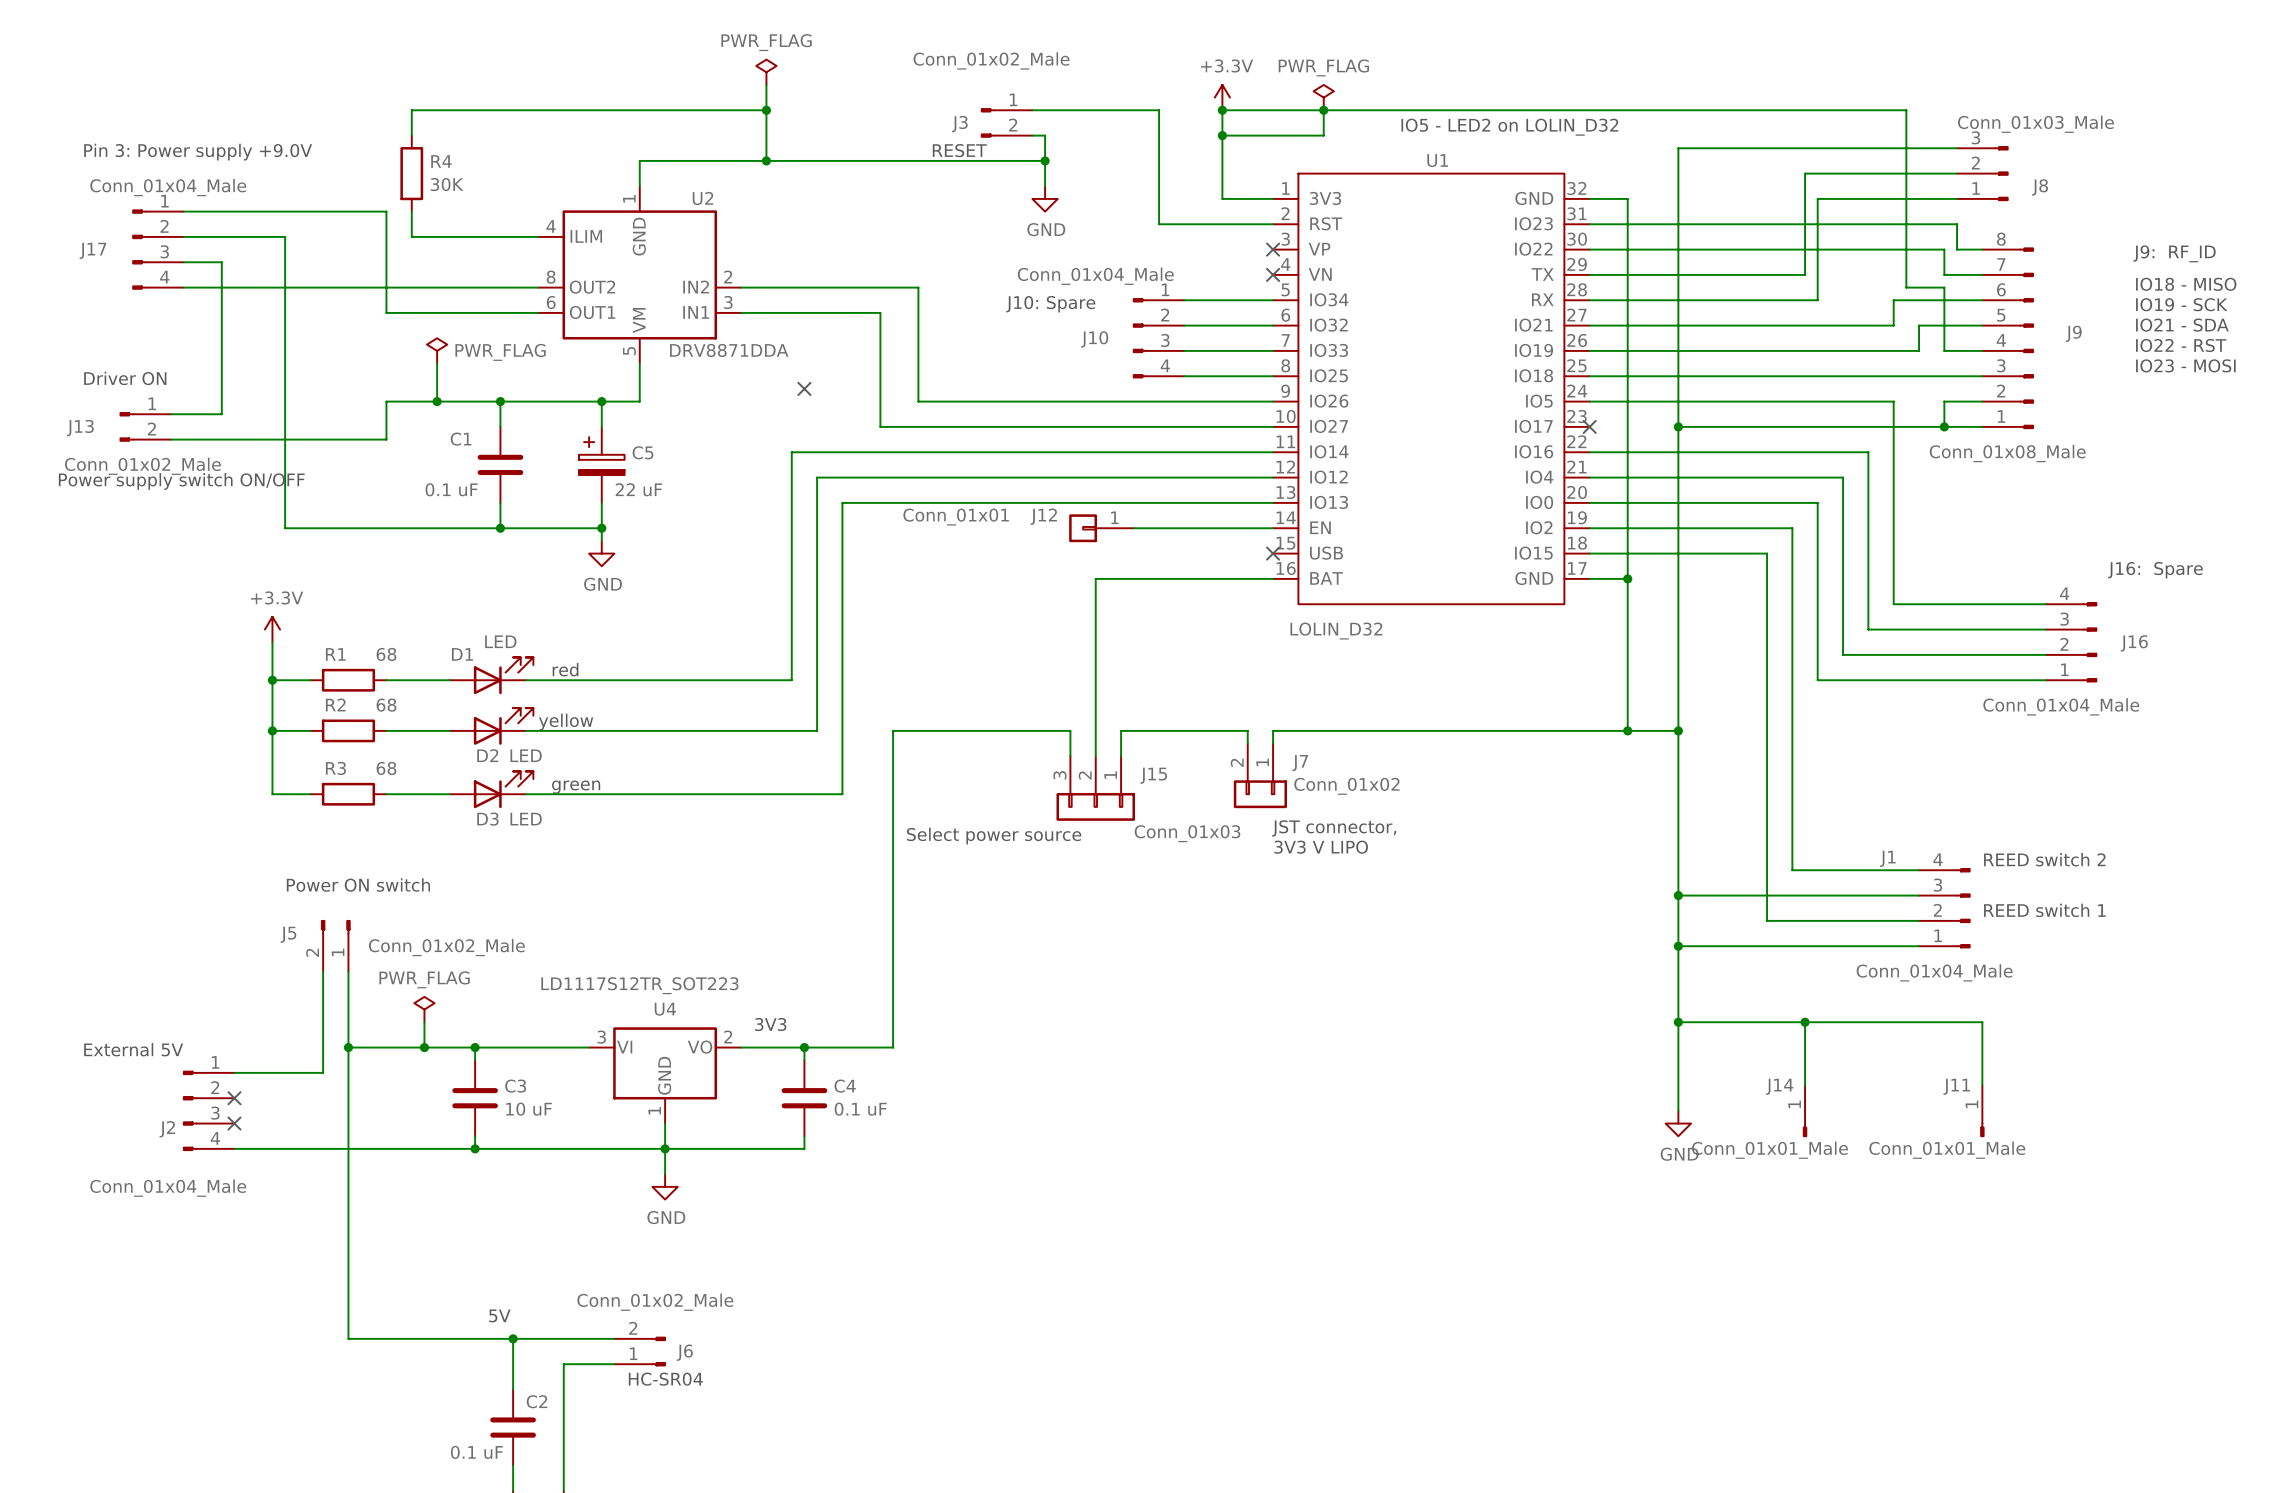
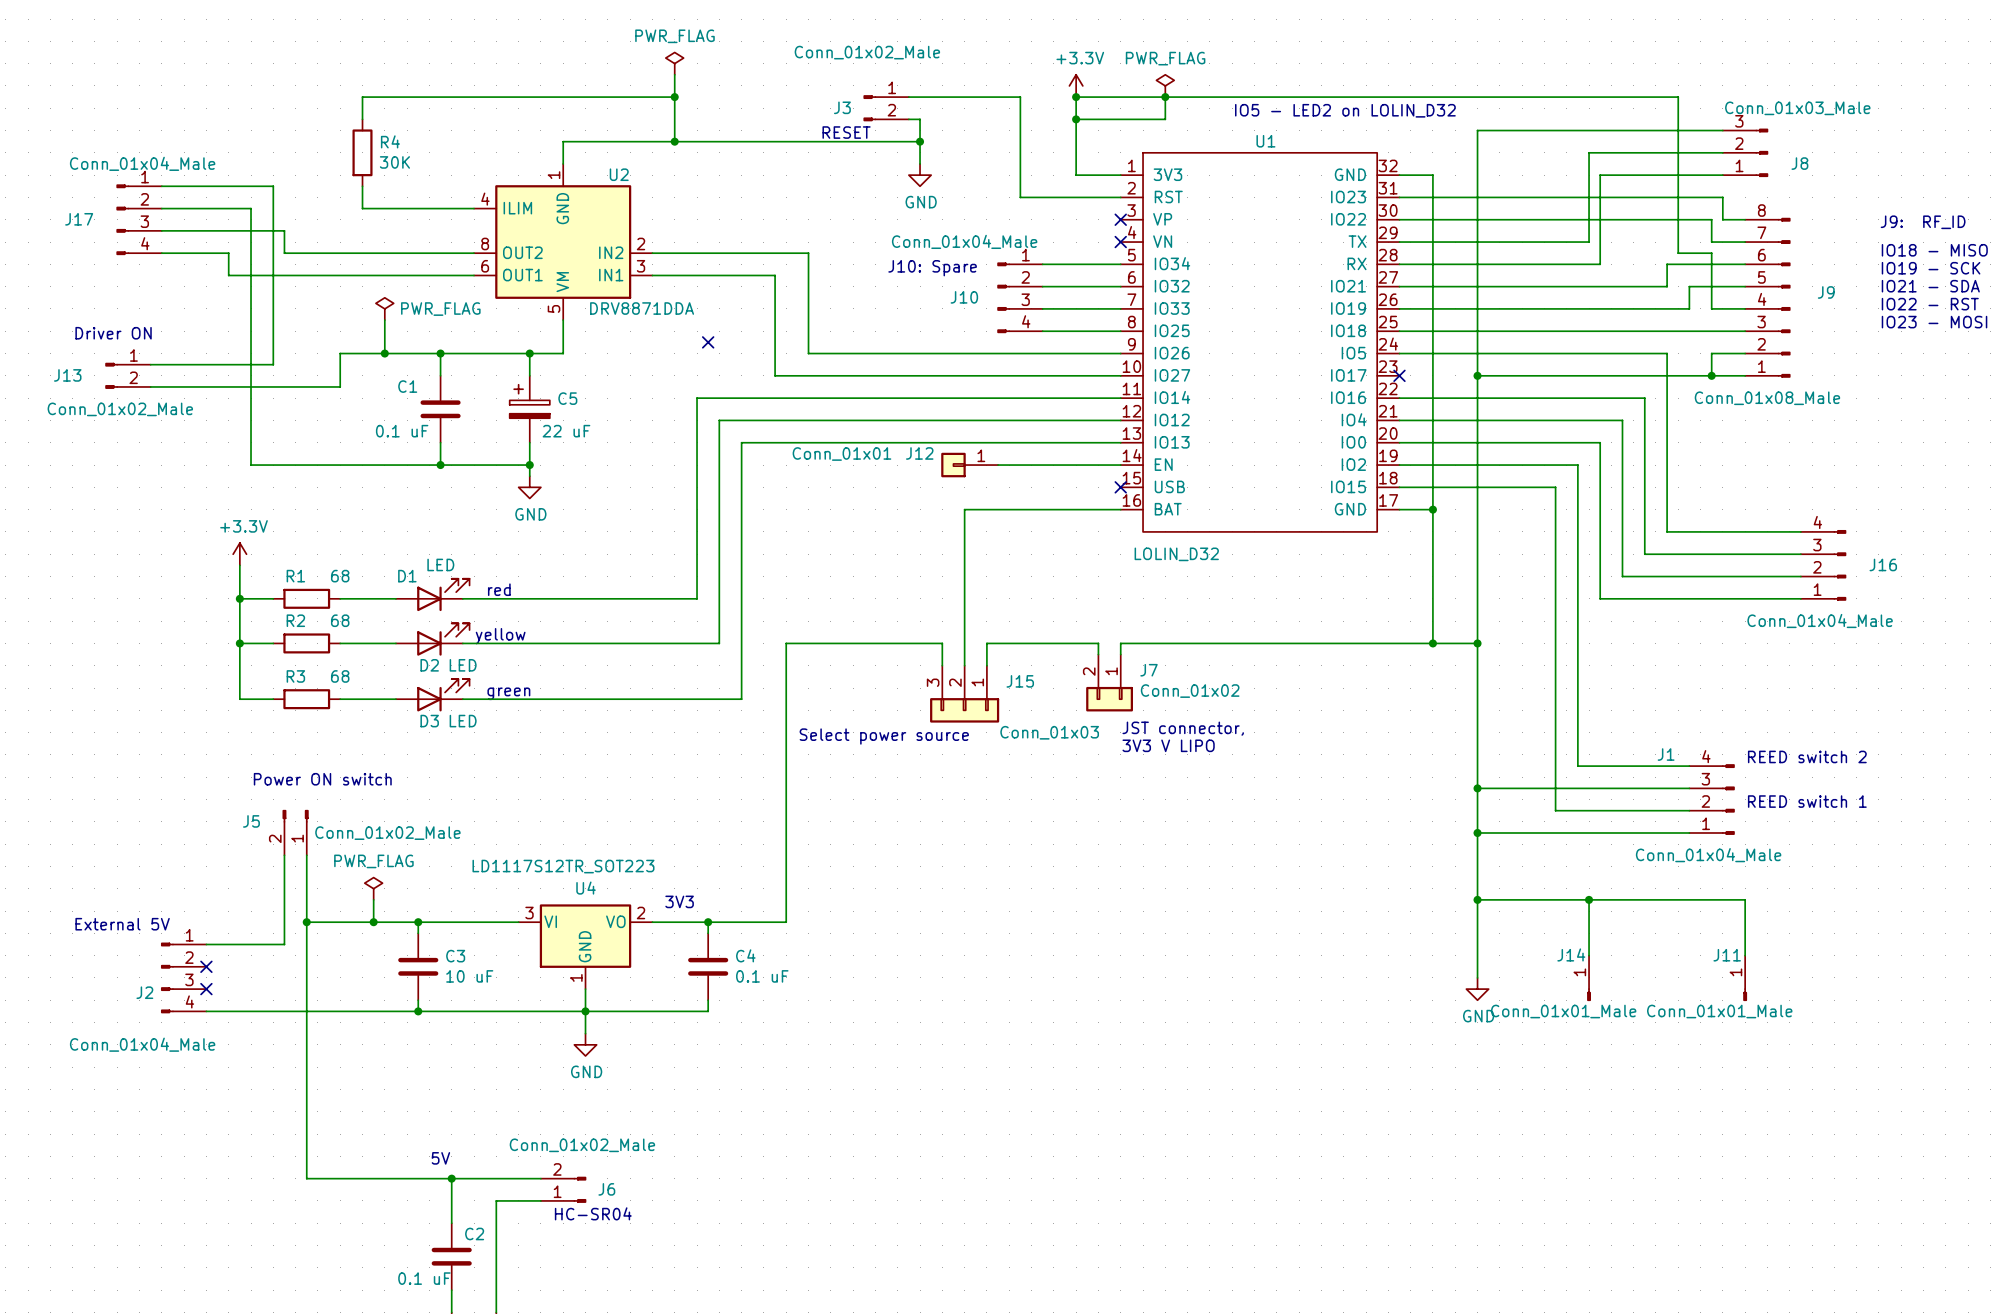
text: Pin 3: Power supply +9.0V (198, 152) -> none
wire: (310, 211) (386, 211) (386, 312) -> (228, 253) (228, 275) (340, 275)
wire: (221, 262) (221, 414) -> (273, 186) (273, 364) (195, 364)
wire: (259, 287) (323, 287) -> (195, 230) (284, 230) (284, 253)
text: Power supply switch ON/OFF (181, 481) -> none
text: J16: Spare (2155, 570) -> none

